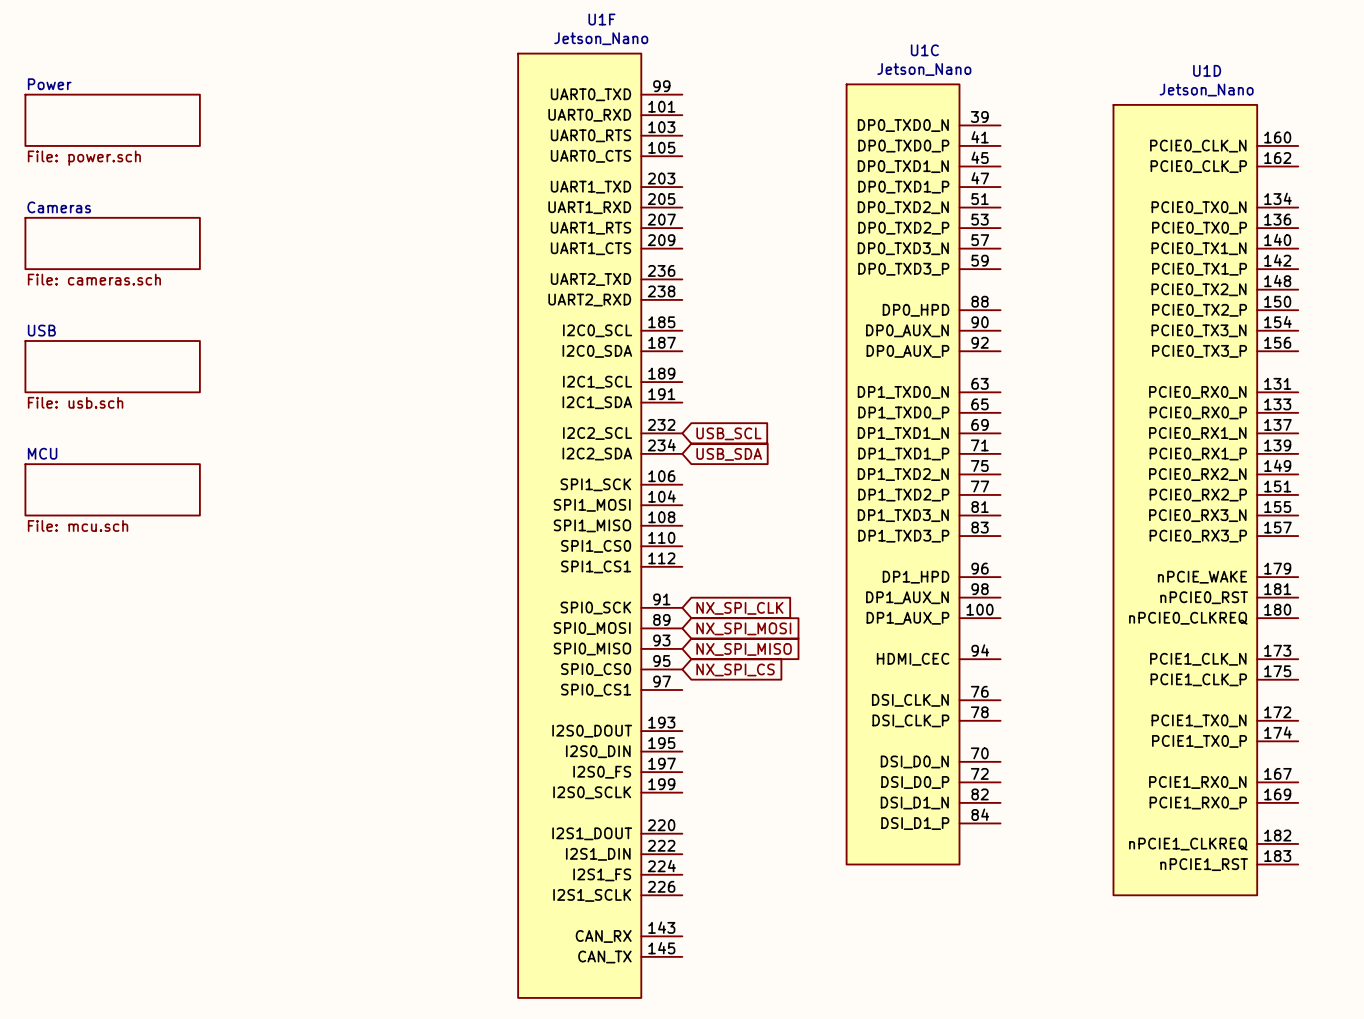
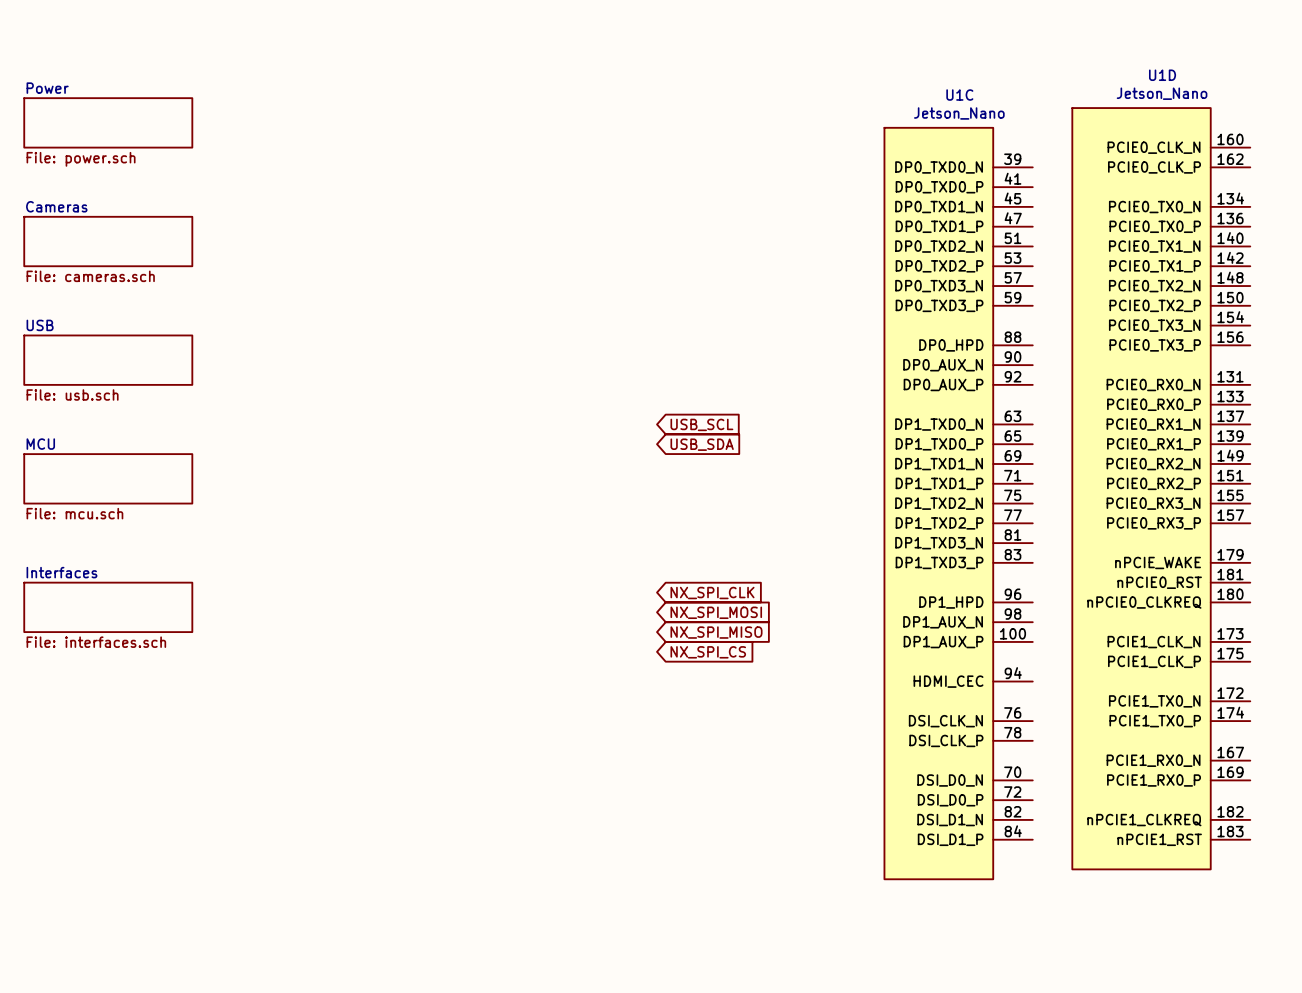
U1C position: (923, 474) -> (958, 503)
U1F: Jetson_Nano (599, 525) -> none
sheet Interfaces: none -> File: interfaces.sch (108, 607)

